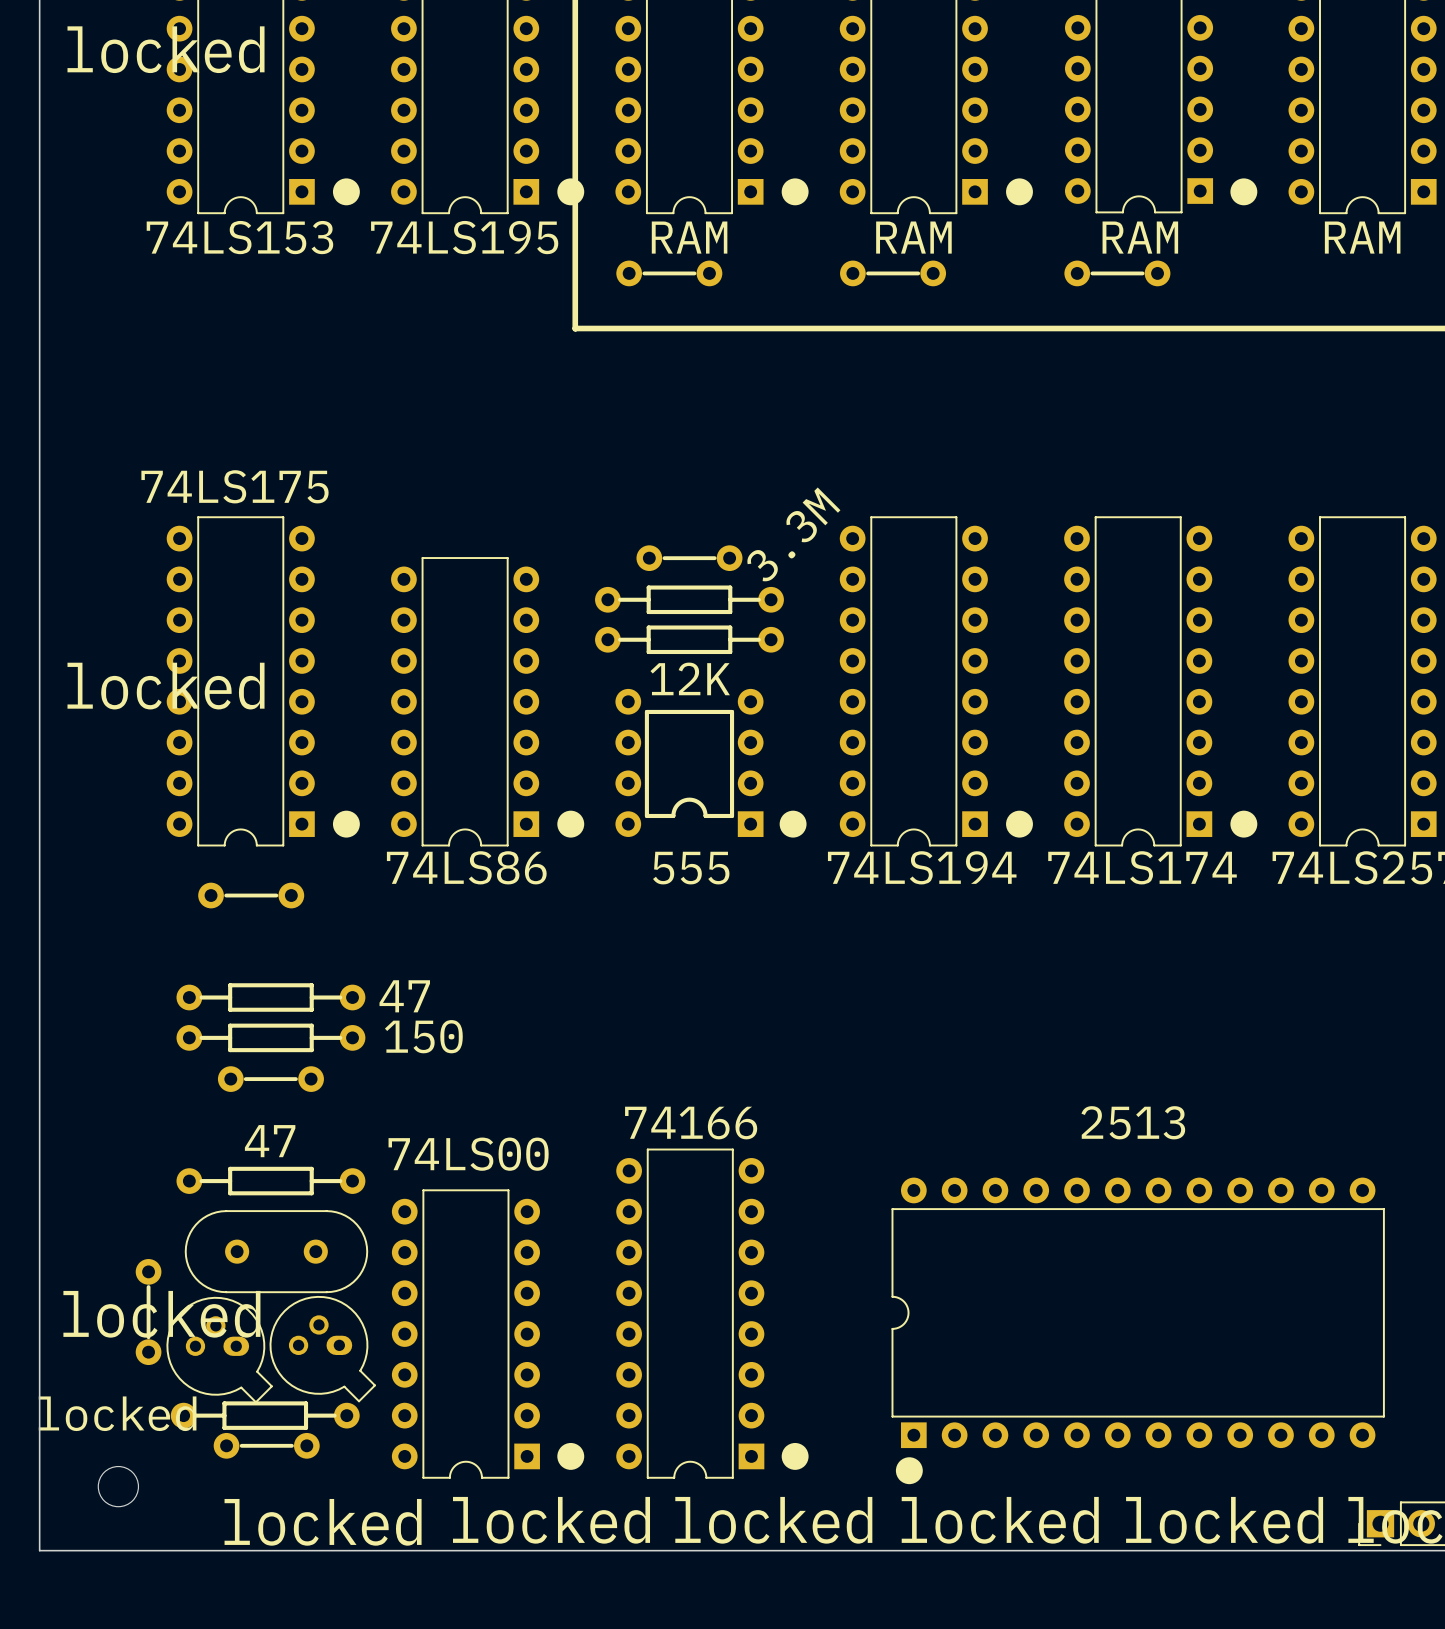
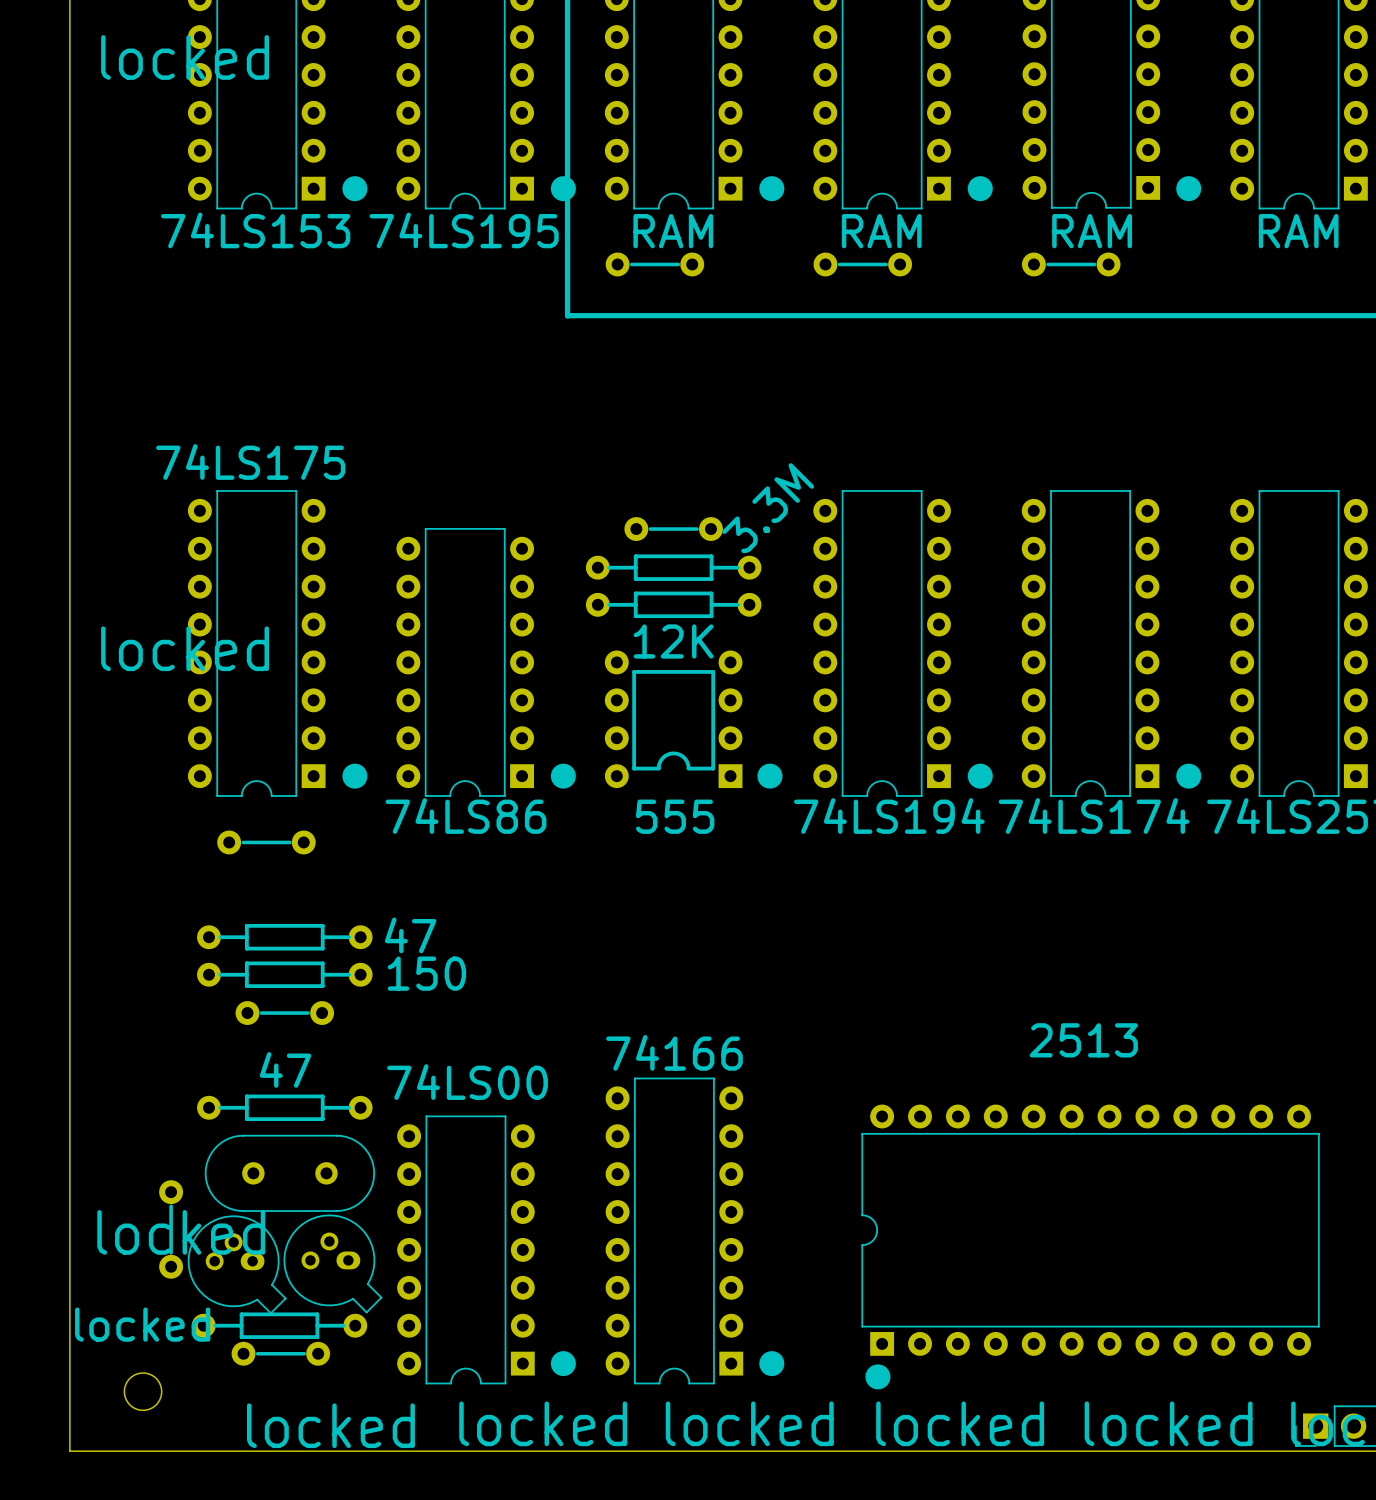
part text position: 2513 (1133, 1122) -> 2513 (1083, 1040)

